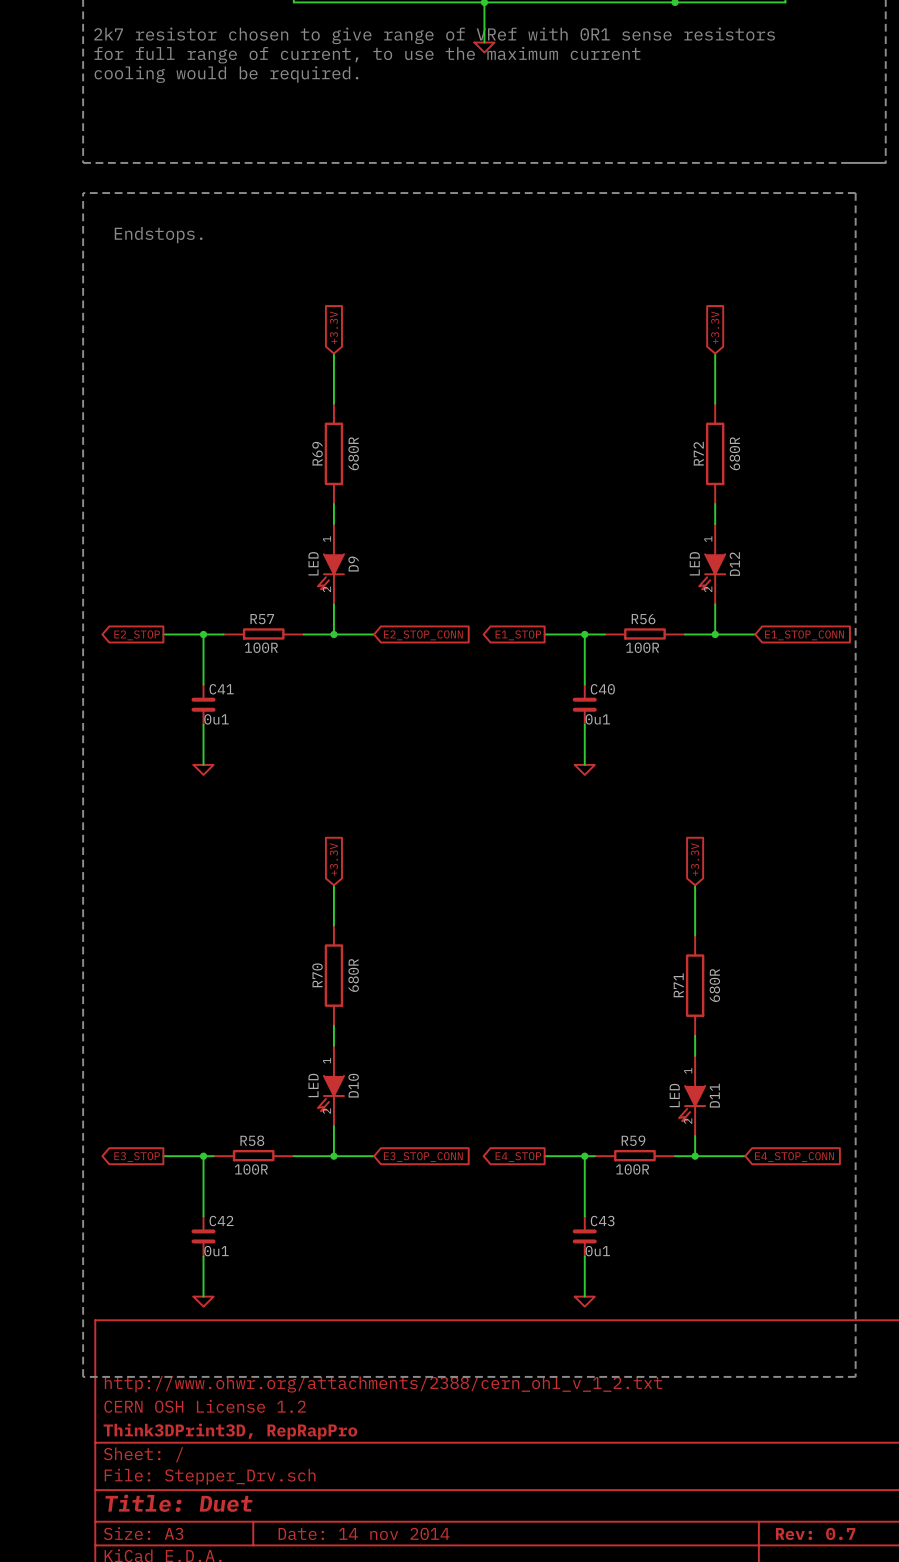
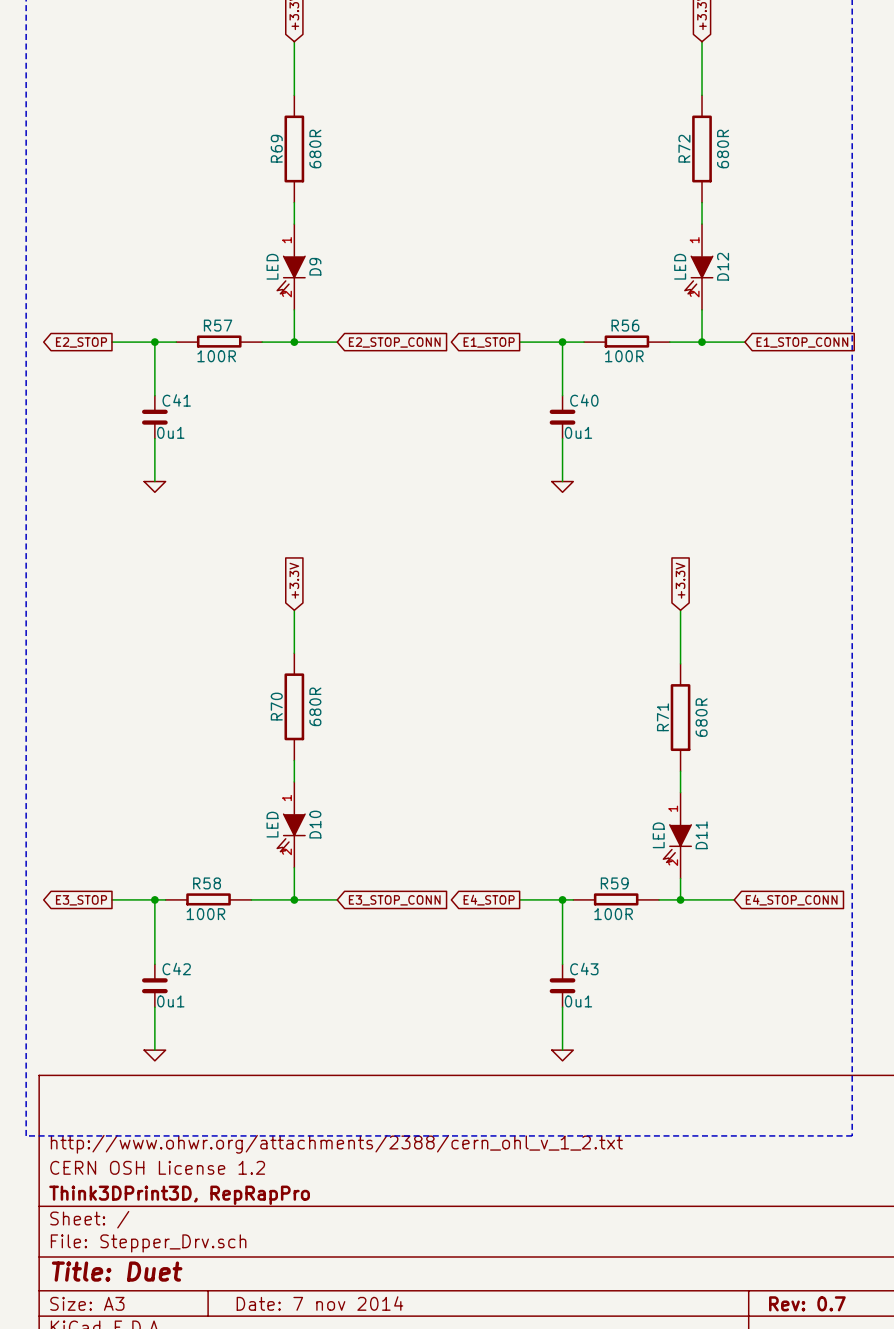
title block: Date: 14 nov 2014 (364, 1533) -> Date: 7 nov 2014 (319, 1303)

